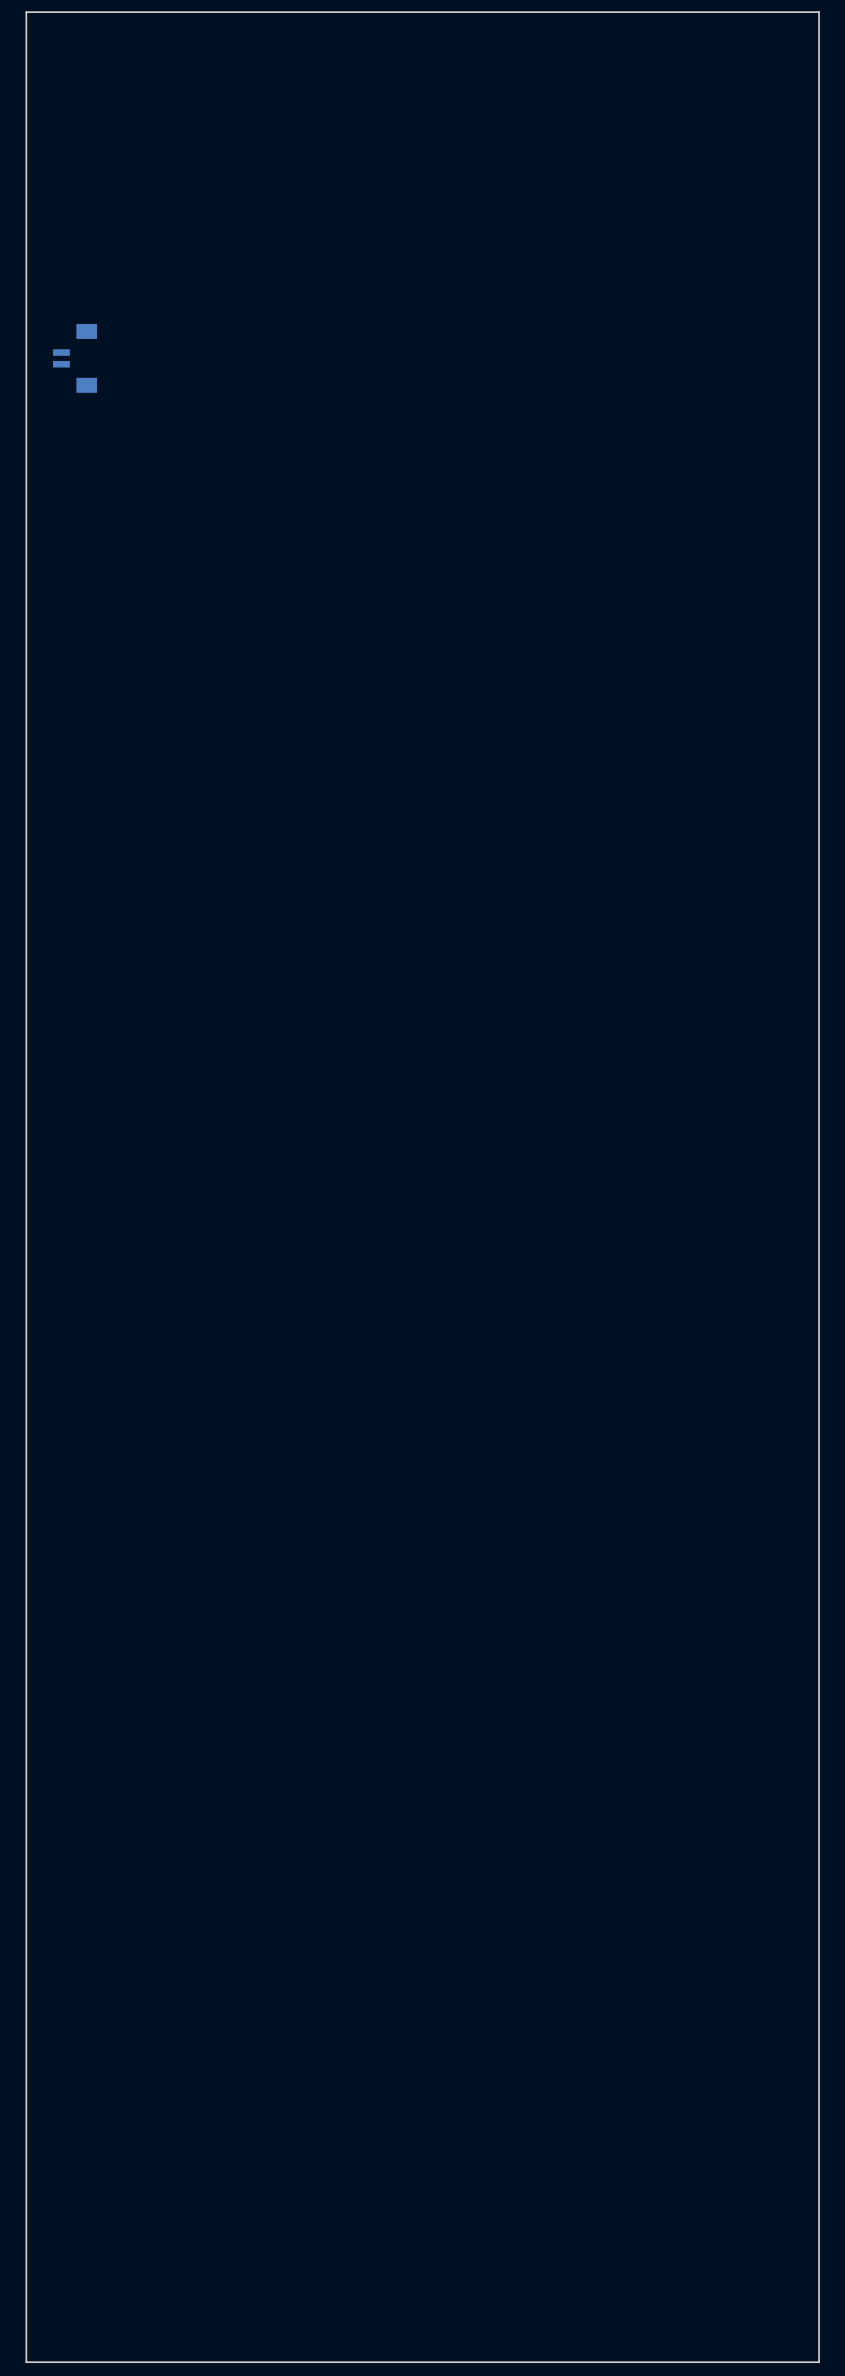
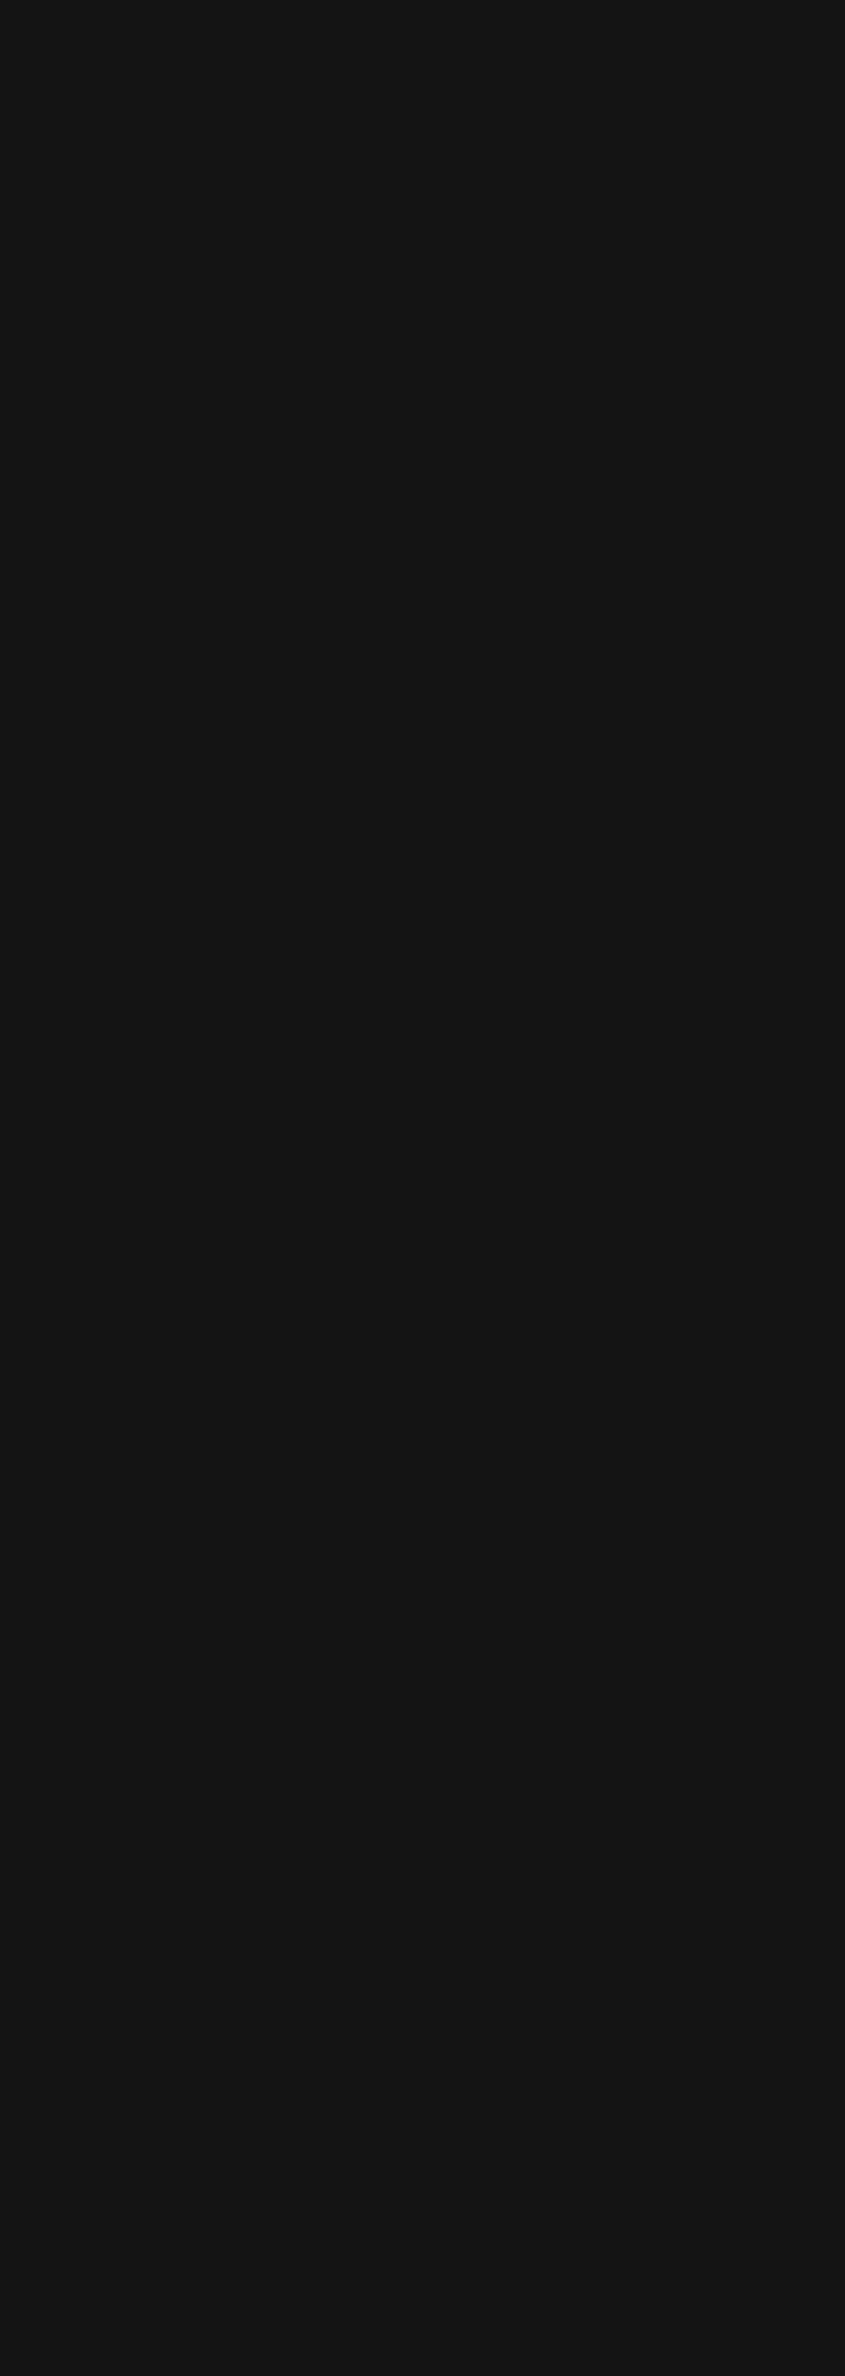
board edge: (819, 12) (26, 12) (26, 2362) (819, 2362) (819, 12) -> none
part: (74, 358) -> none

